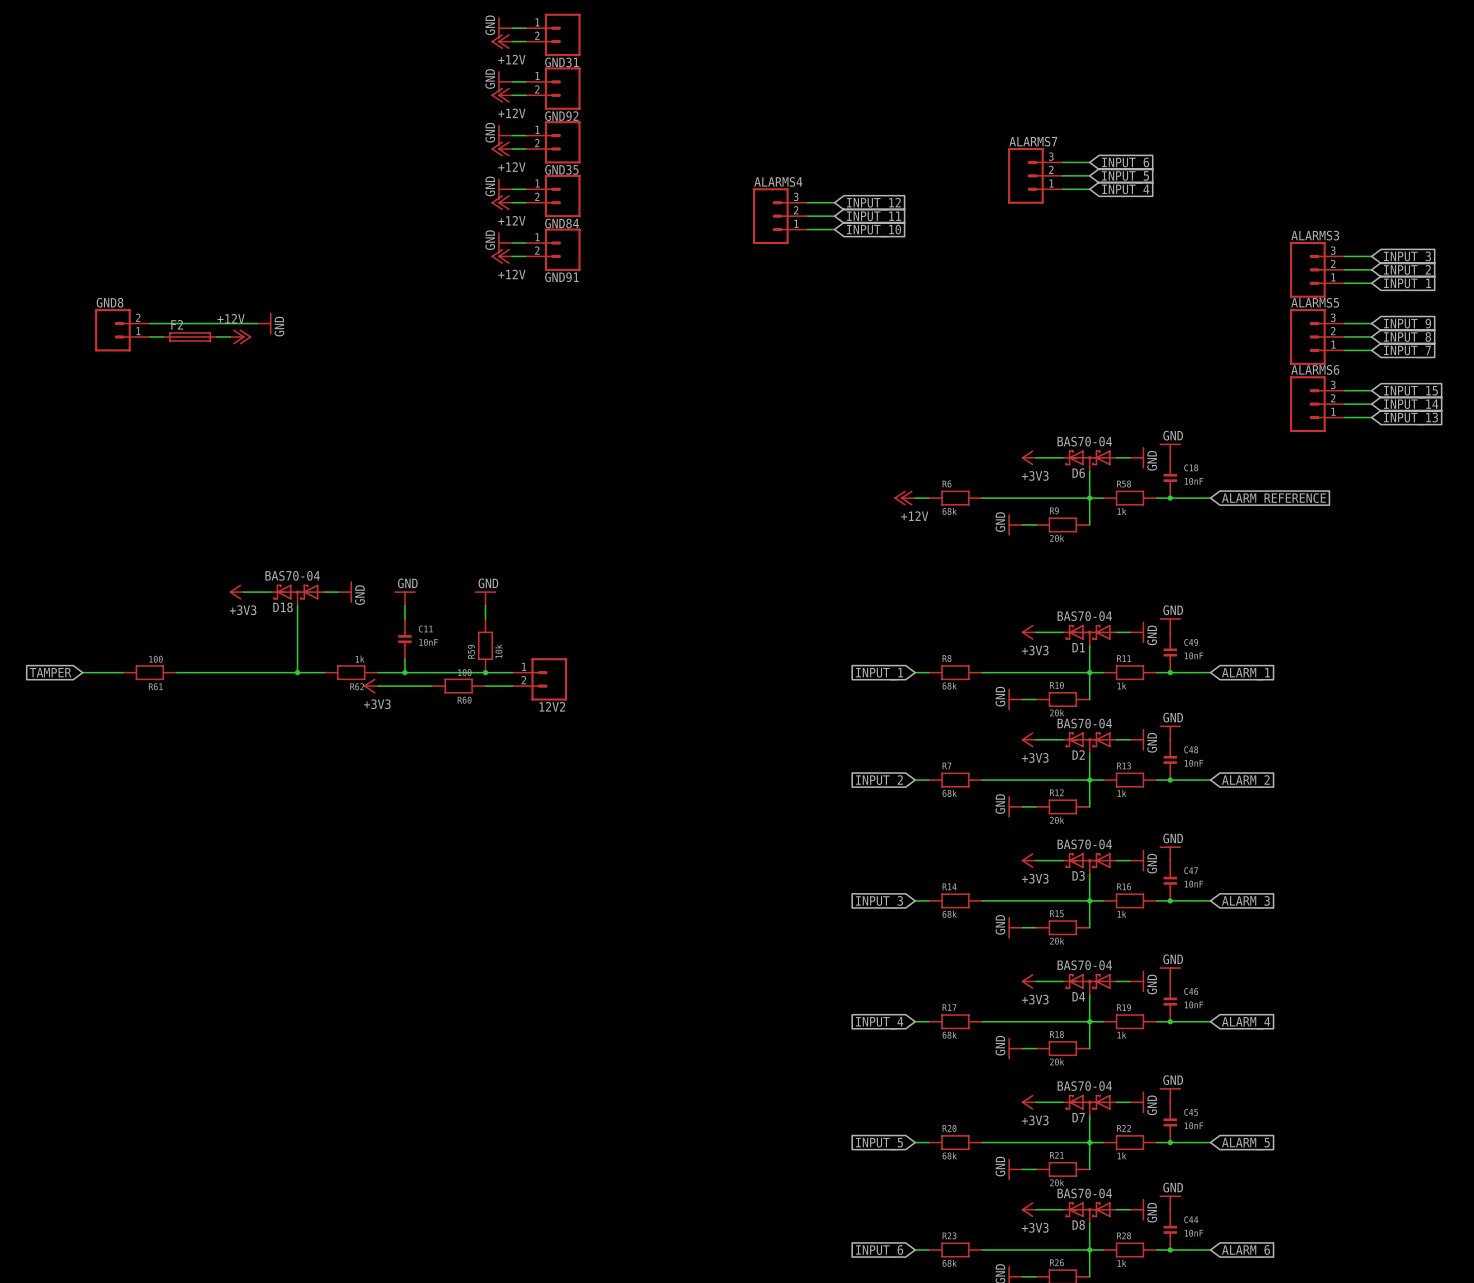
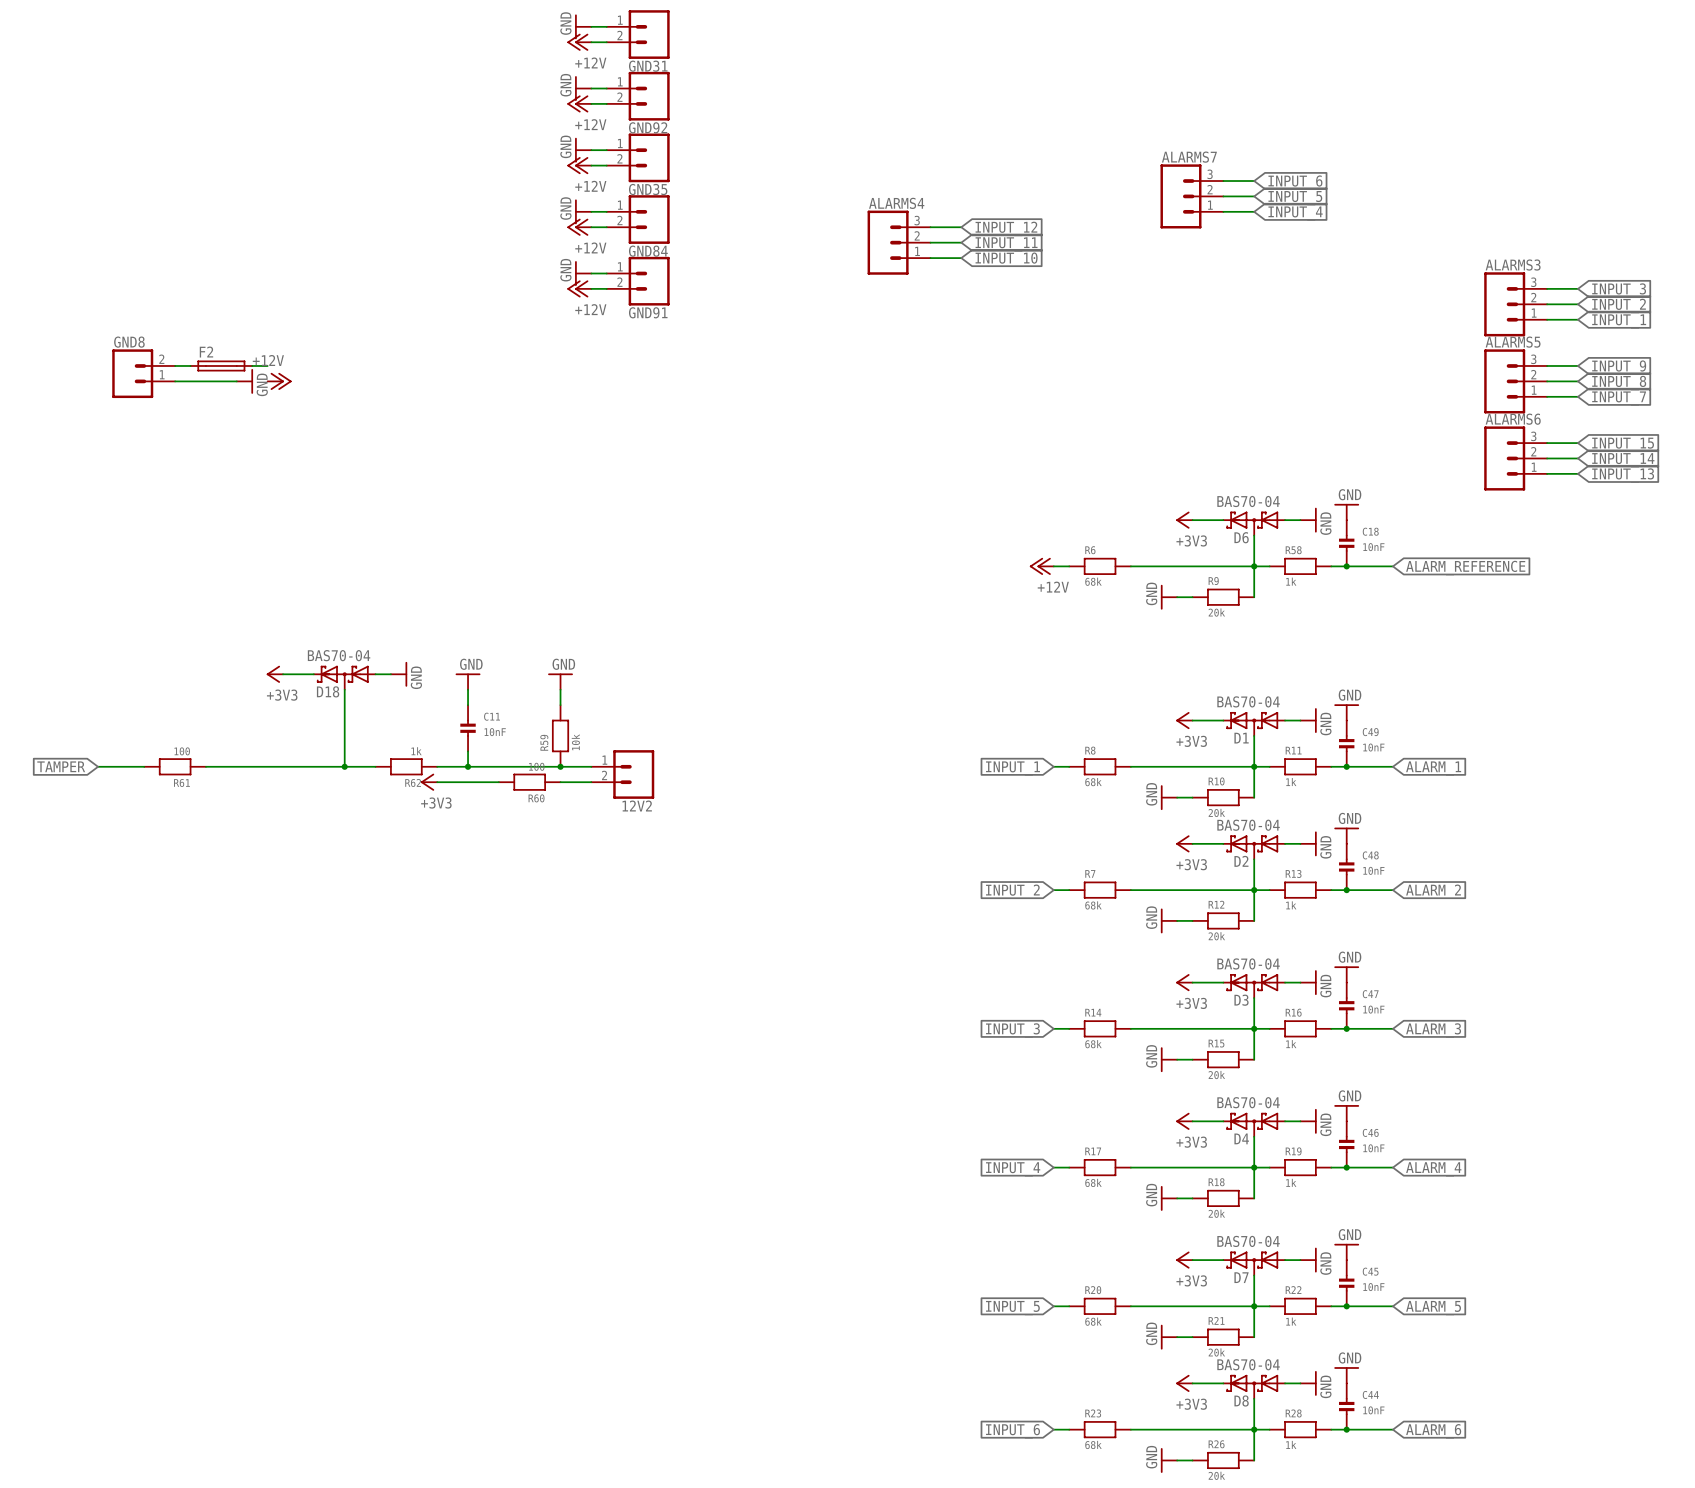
wire: (230, 323) (257, 323) -> none
power symbol position: GND (264, 323) -> GND (244, 381)
F2 position: (190, 336) -> (221, 365)
wire: (216, 336) (230, 336) -> none

